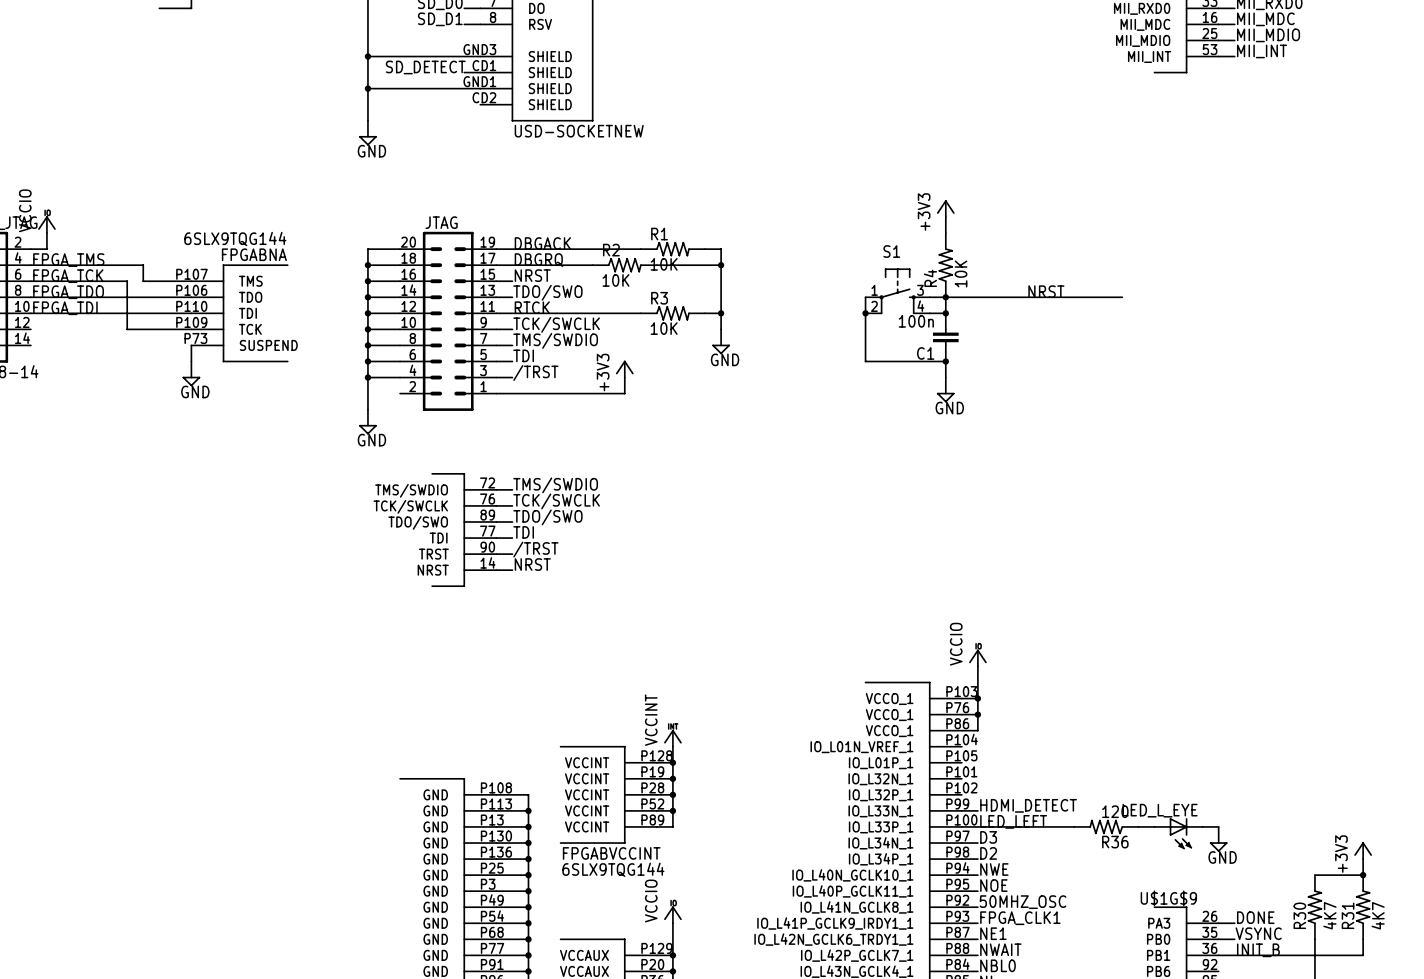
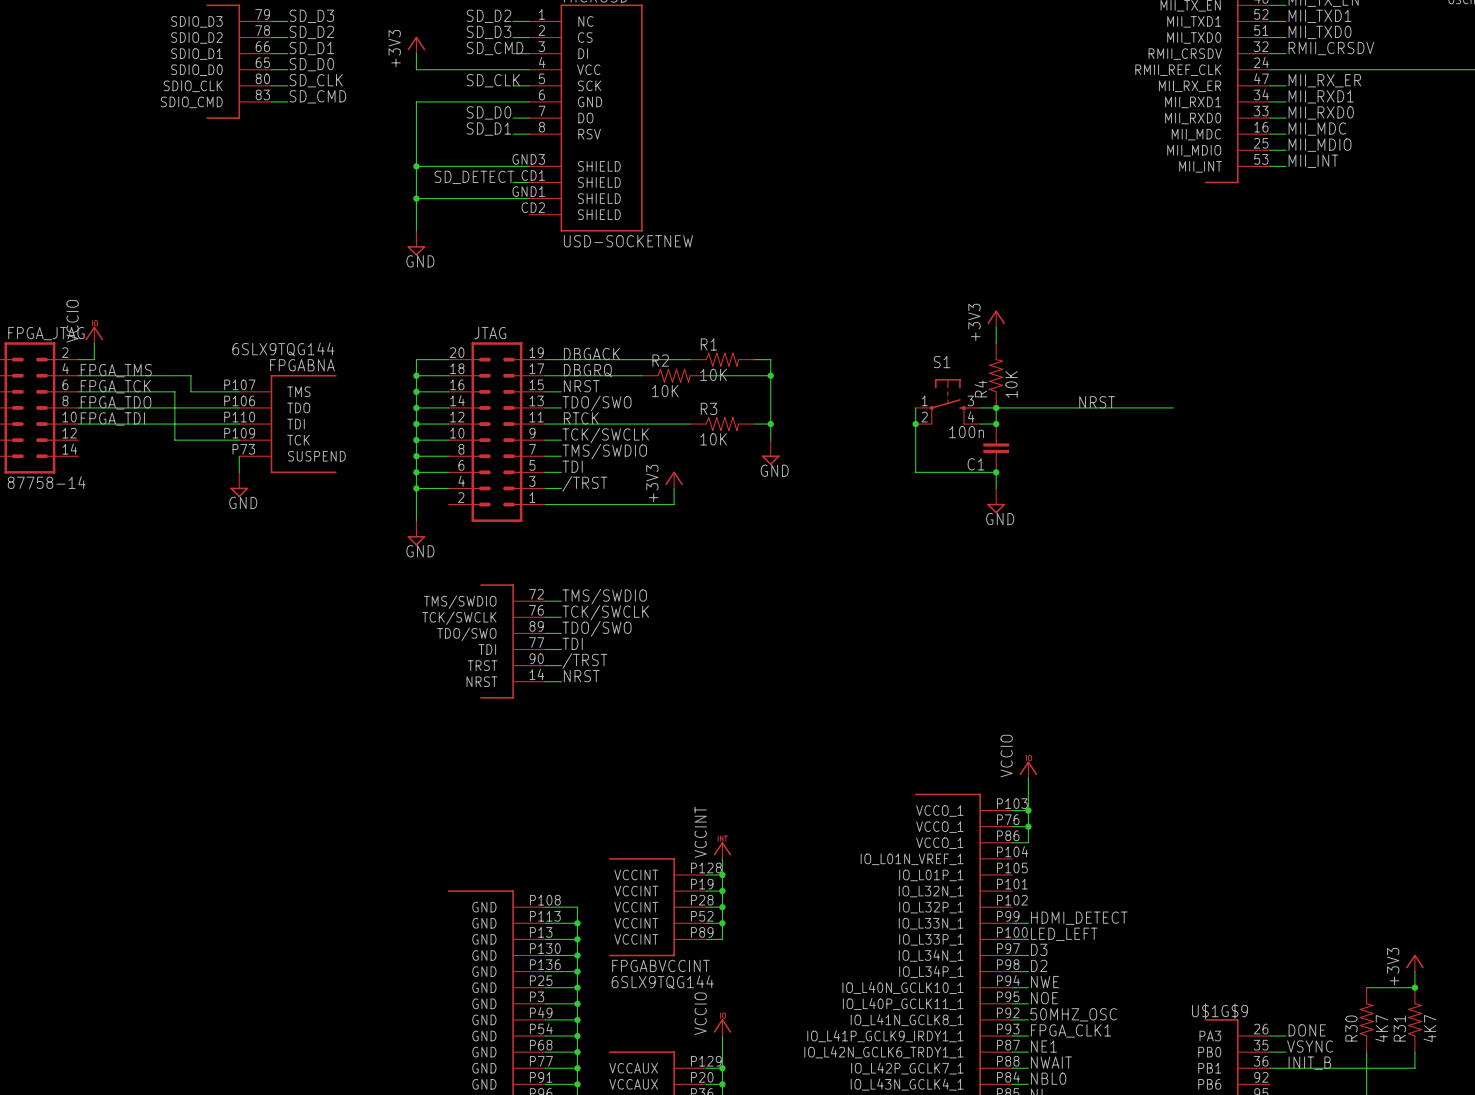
wire: (977, 826) (1074, 826) -> none
R36: 120 (1106, 826) -> none
wire: (1138, 826) (1154, 826) -> none
wire: (1202, 826) (1218, 826) -> none
LED_L_EYE: (1178, 833) -> none
power symbol: GND (1218, 839) -> none

